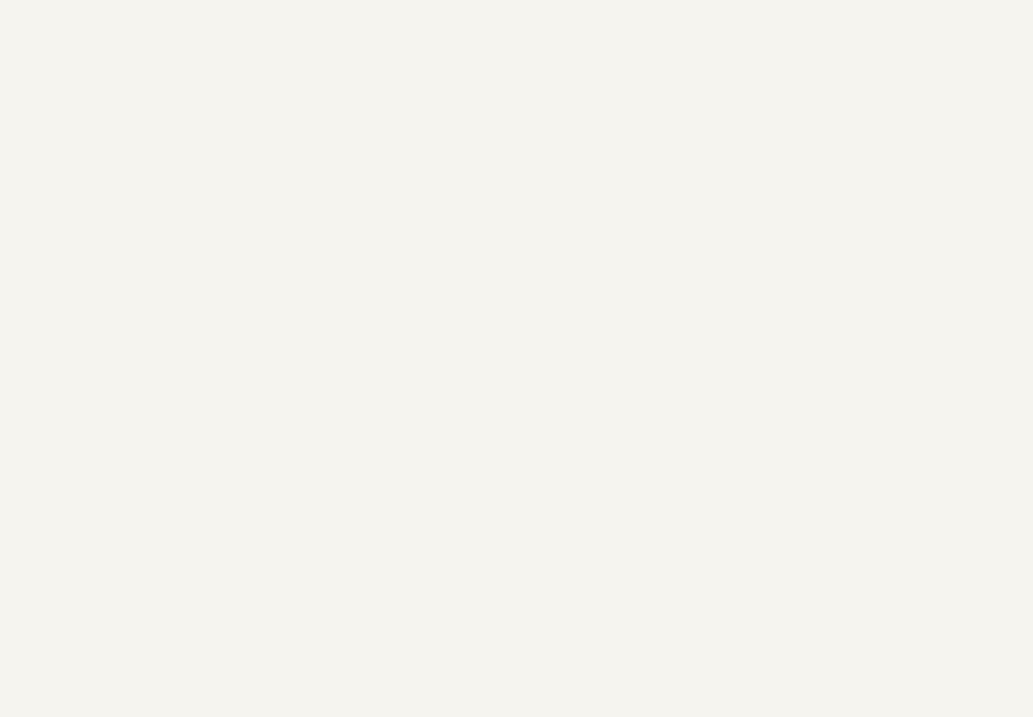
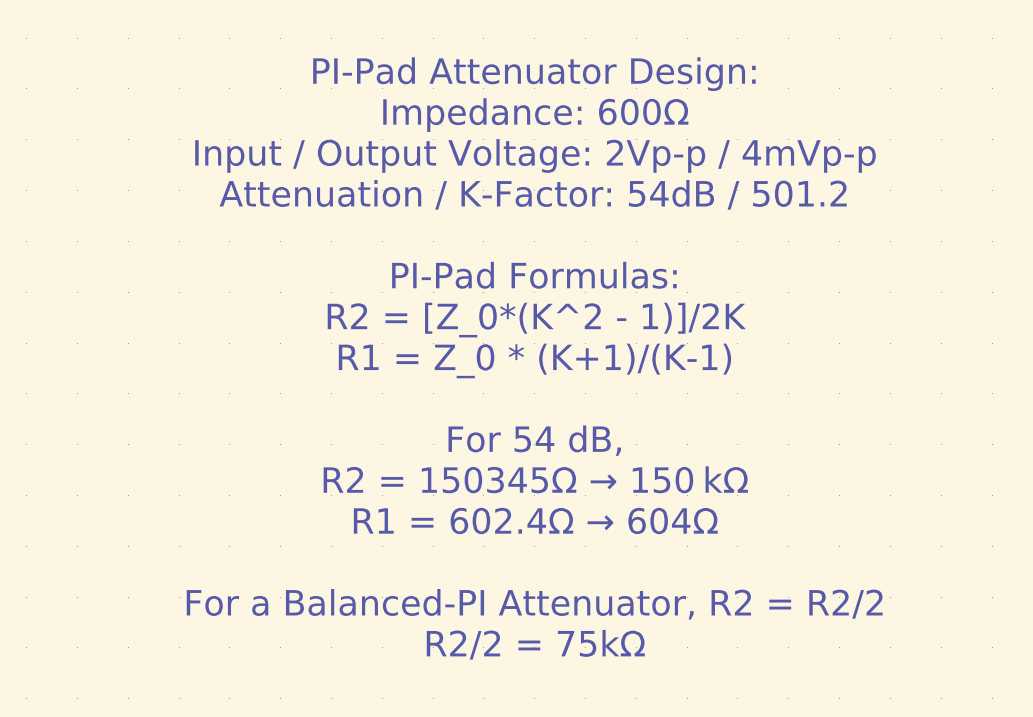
text: none -> PI-Pad Attenuator Design: (534, 74)
text: none -> Impedance: 600Ω (535, 115)
text: none -> Input / Output Voltage: 2Vp-p / 4mVp-p (535, 155)
text: none -> Attenuation / K-Factor: 54dB / 501.2 (533, 194)
text: none -> PI-Pad Formulas: (534, 275)
text: none -> R2 = [Z_0*(K^2 - 1)]/2K (536, 320)
text: none -> R1 = Z_0 * (K+1)/(K-1) (534, 360)
text: none -> For 54 dB, (534, 440)
text: none -> R2 = 150345Ω → 150 kΩ (535, 479)
text: none -> R1 = 602.4Ω → 604Ω (535, 520)
text: none -> For a Balanced-PI Attenuator, R2 = R2/2 (534, 604)
text: none -> R2/2 = 75kΩ (535, 644)

